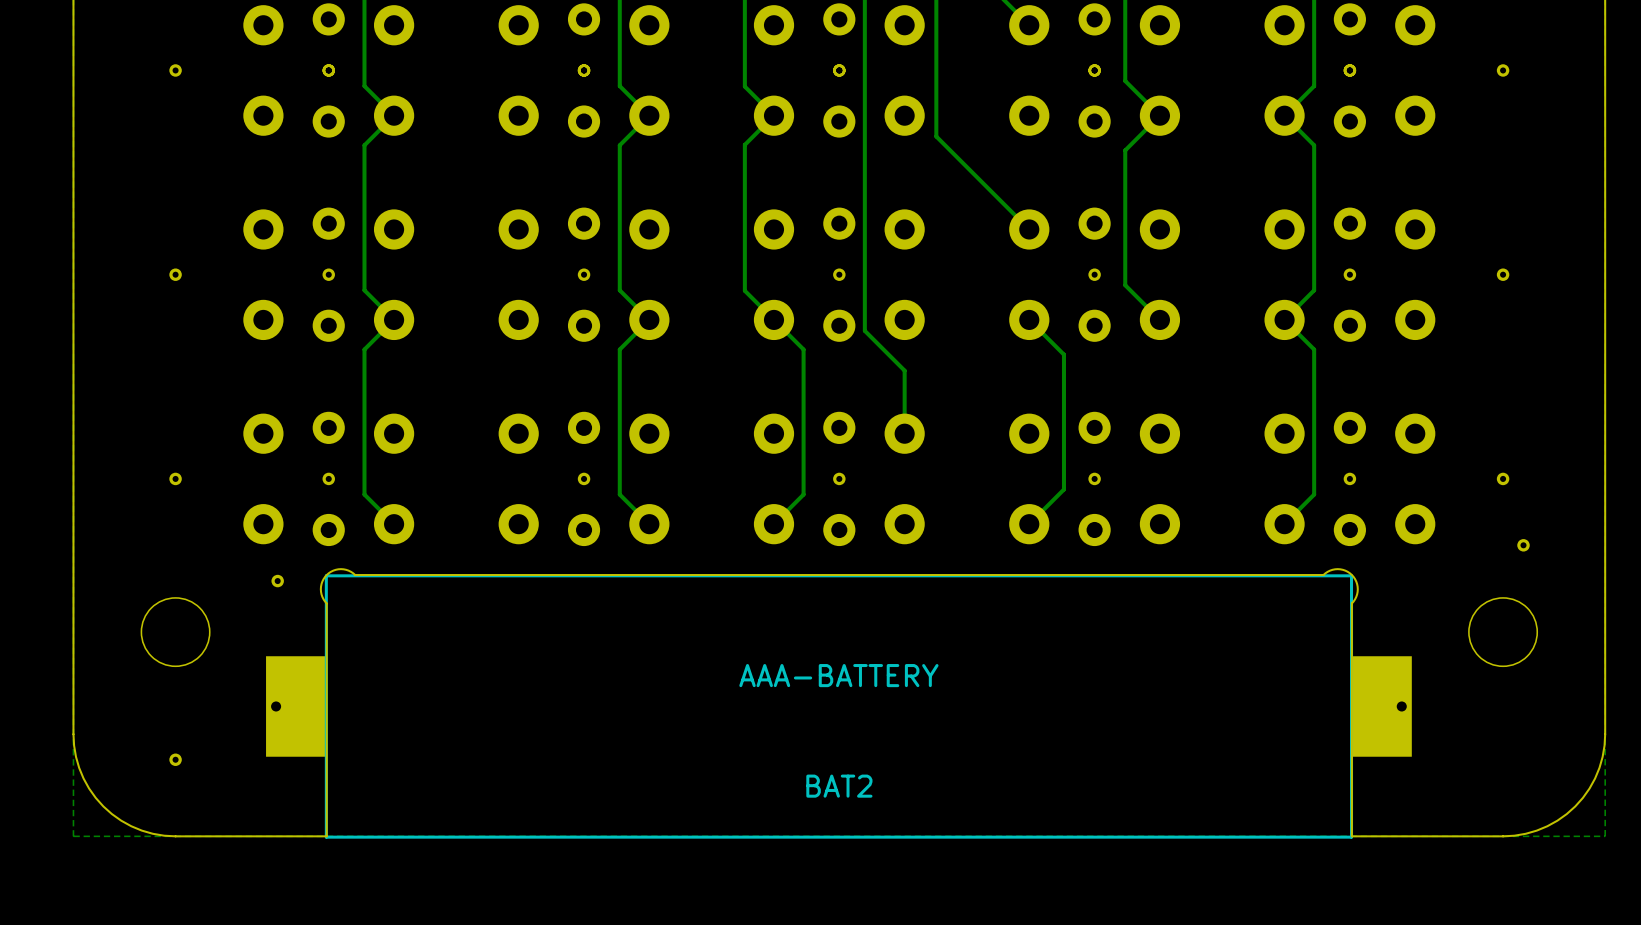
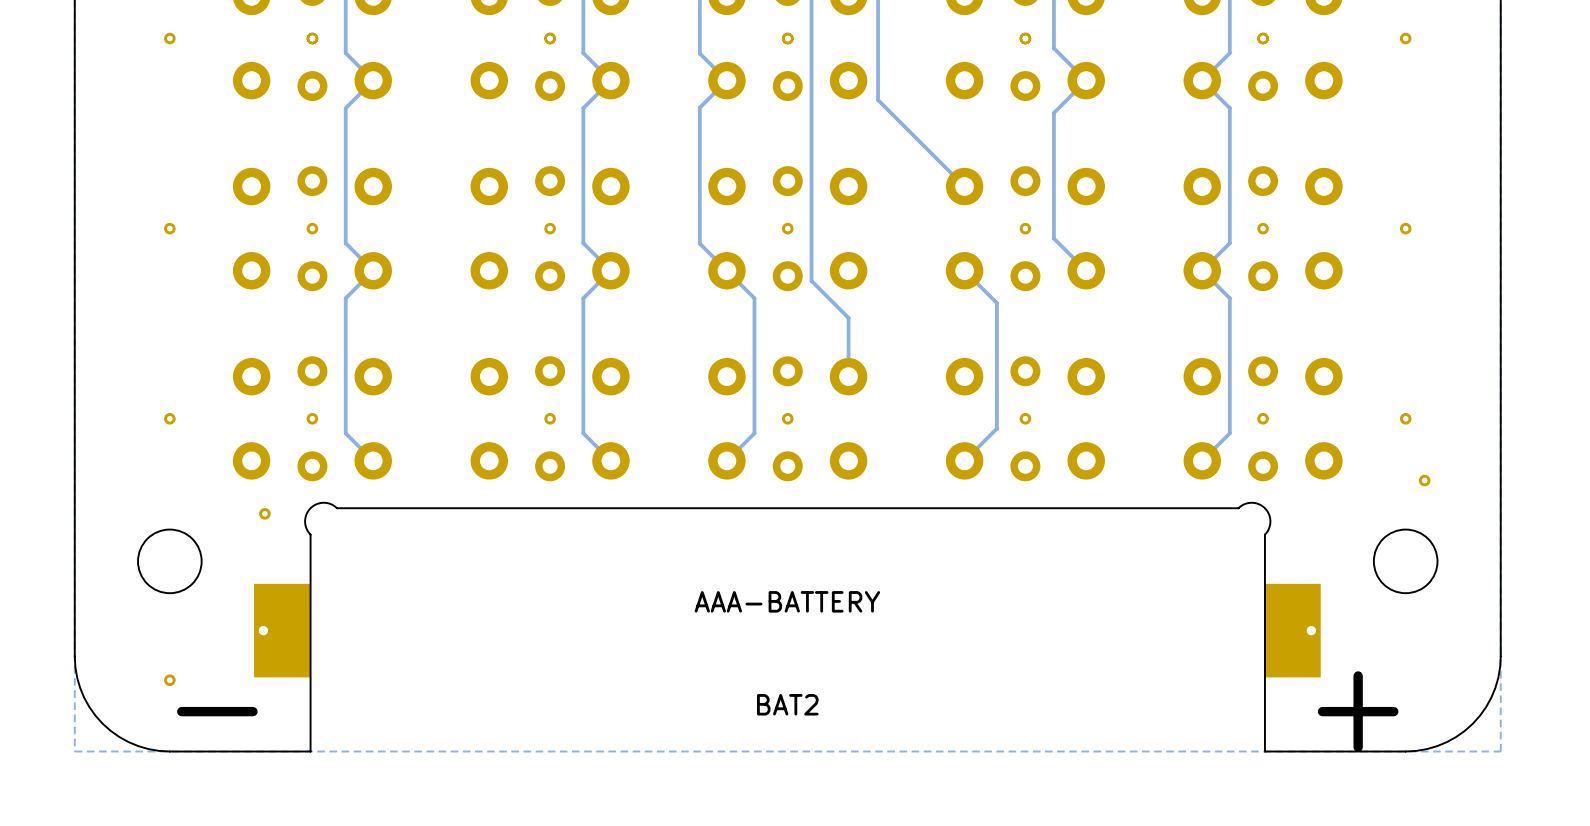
BAT2 footprint: [266, 574, 1412, 839] -> [254, 583, 1321, 678]
text: none -> - (217, 711)
text: none -> + (1358, 711)

